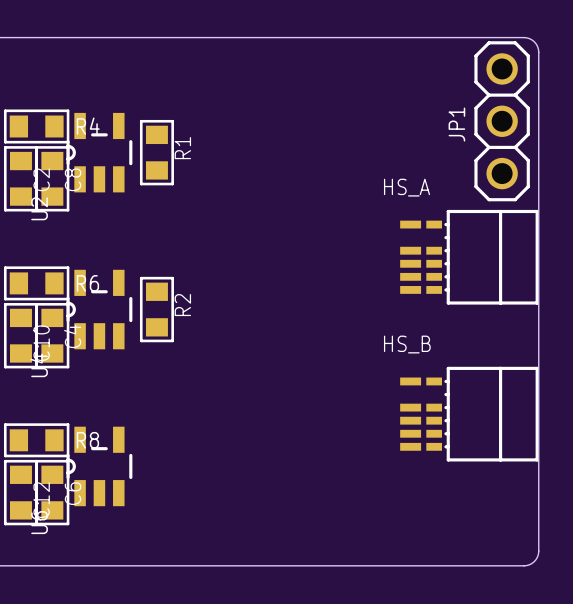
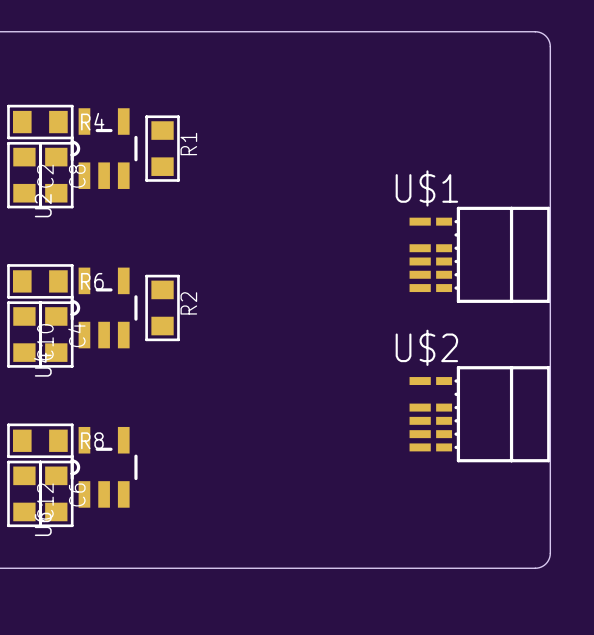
JP1: (502, 121) -> none
HS_A name: HS_A (407, 187) -> U$1 (426, 188)
HS_B name: HS_B (407, 344) -> U$2 (426, 347)

